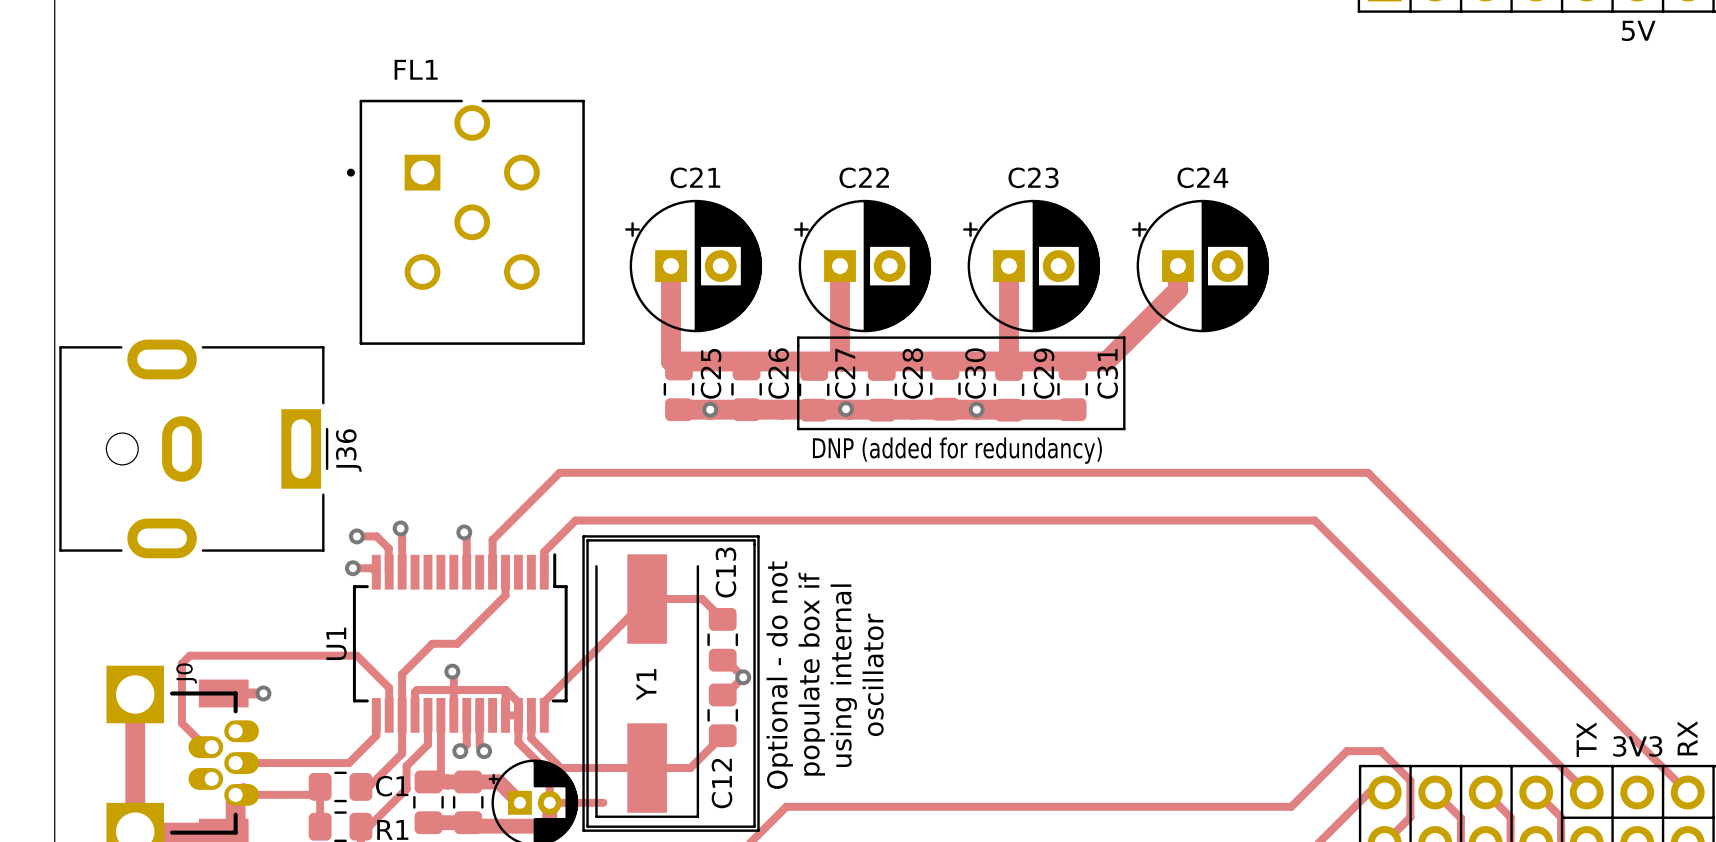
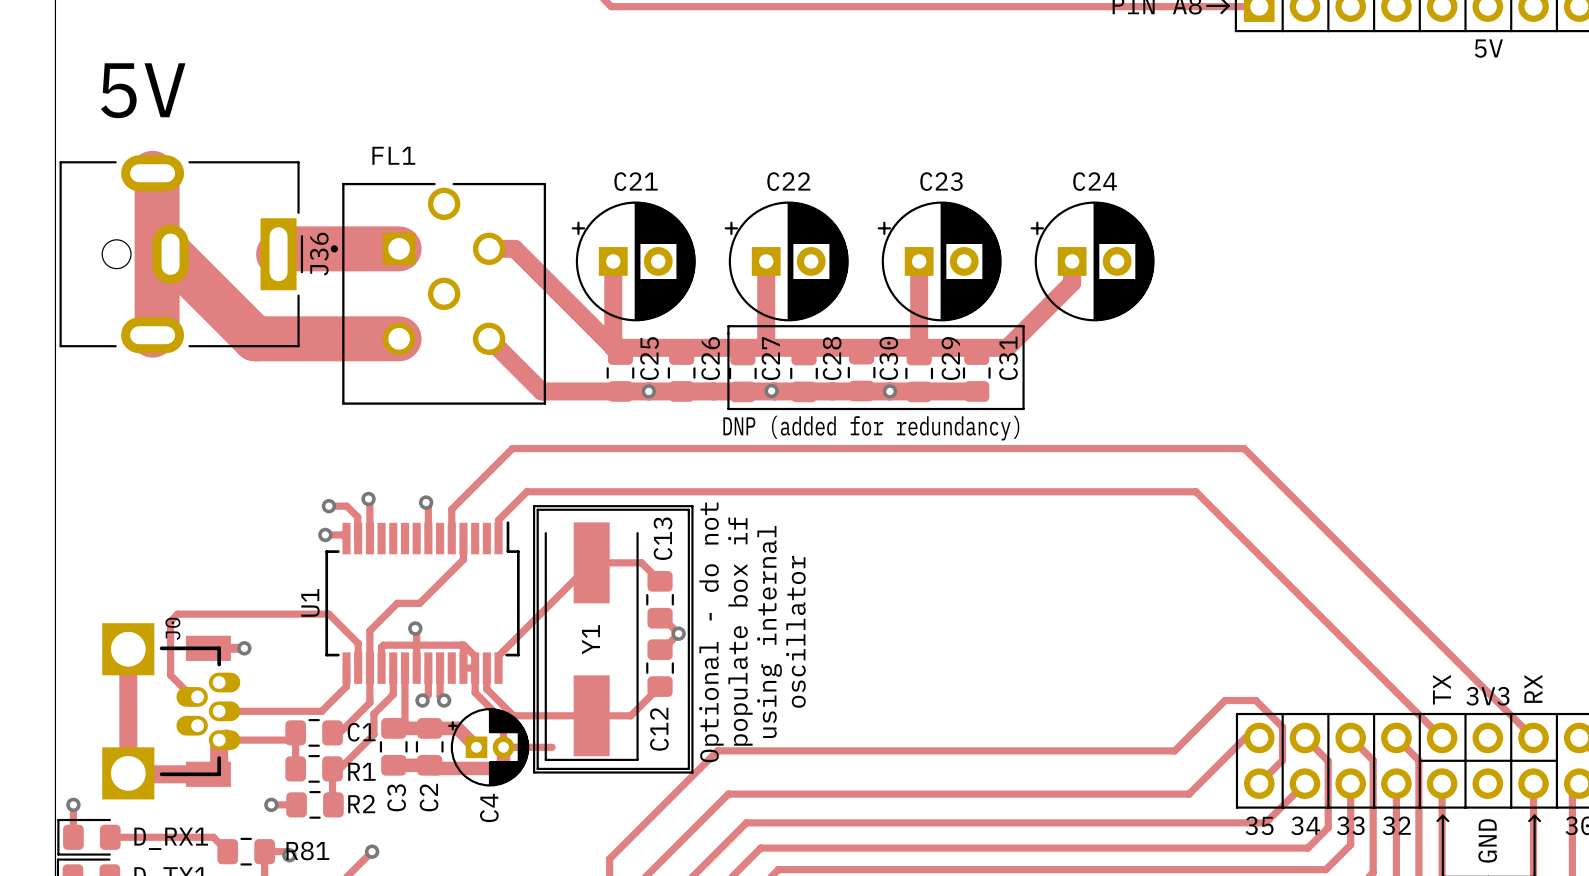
text: none -> 5V (143, 90)
track: none -> (152, 173) (157, 177) (157, 330) (152, 335)
FL1 position: (465, 222) -> (438, 293)
track: none -> (399, 248) (283, 248) (278, 254)
track: none -> (489, 248) (514, 248) (620, 354)
track: none -> (170, 254) (255, 338) (399, 338)
track: none -> (489, 338) (541, 391) (620, 391)
J36 position: (193, 448) -> (181, 254)

